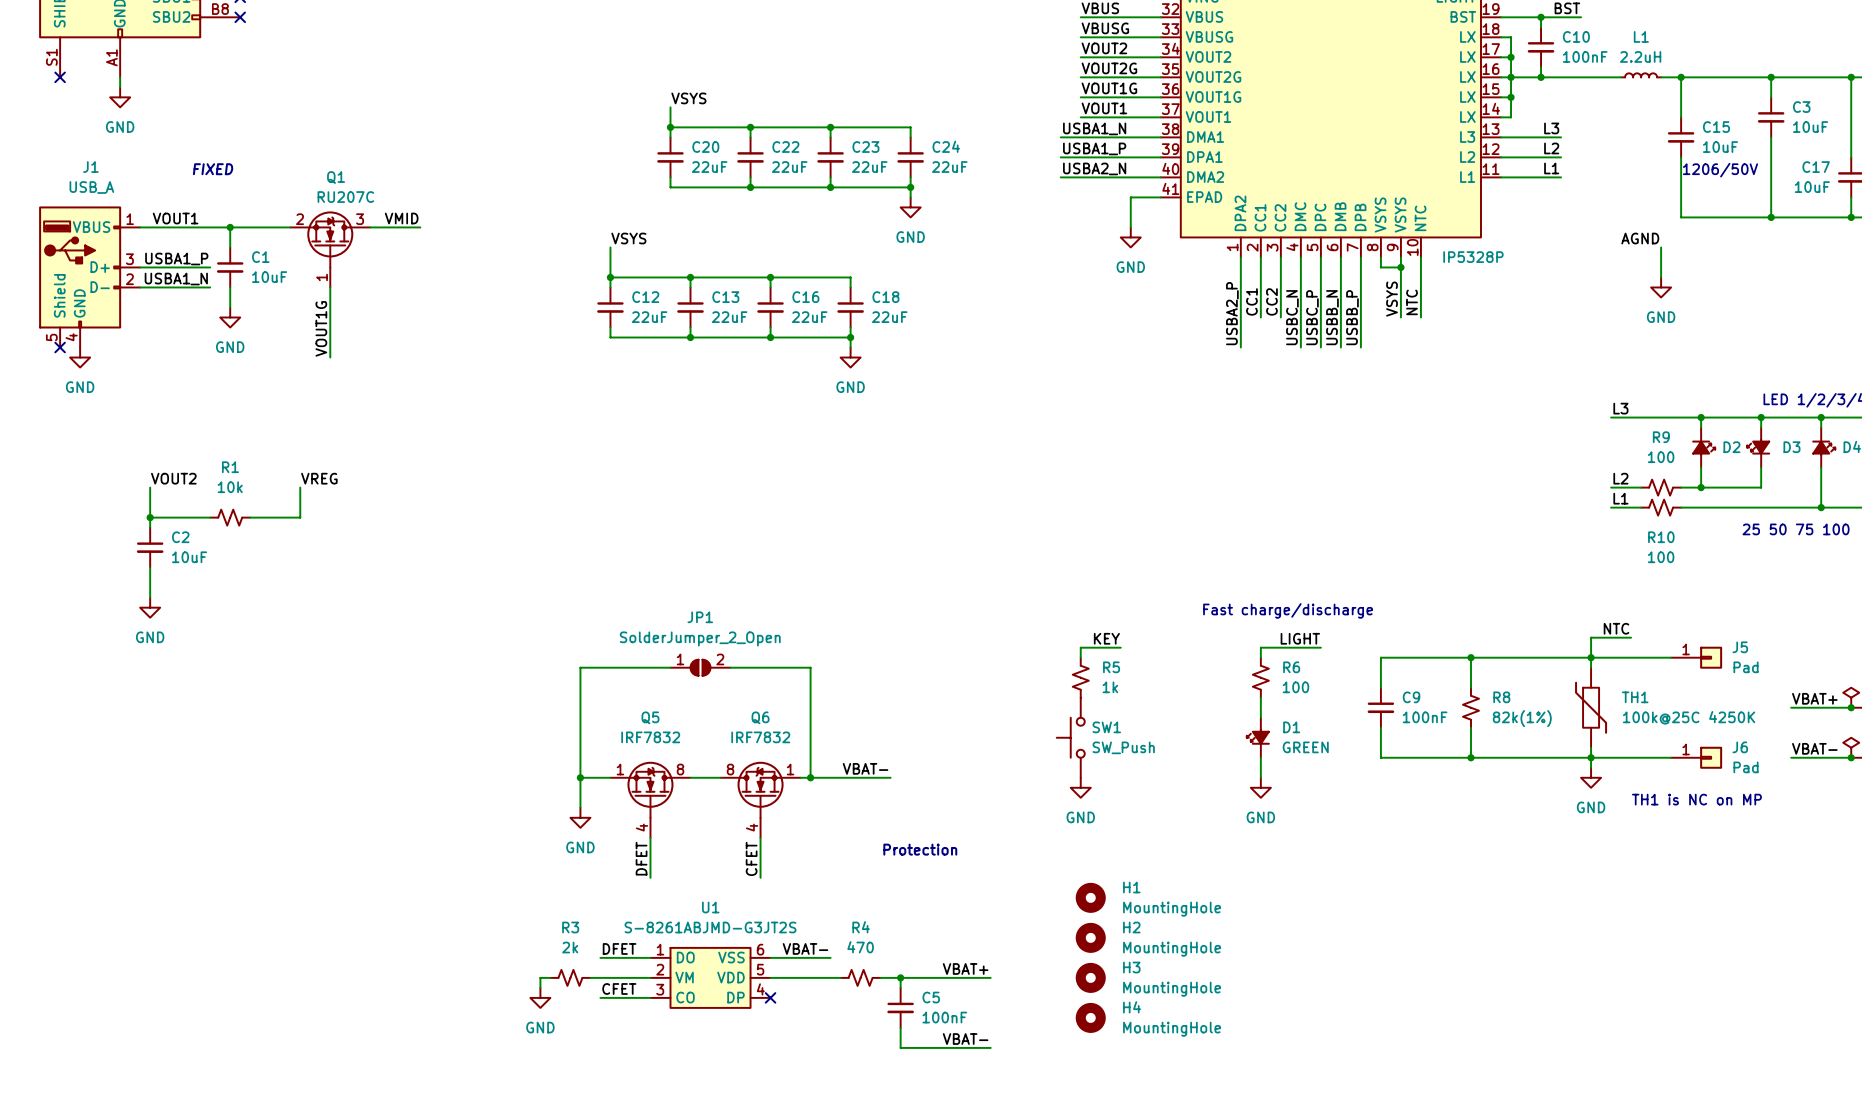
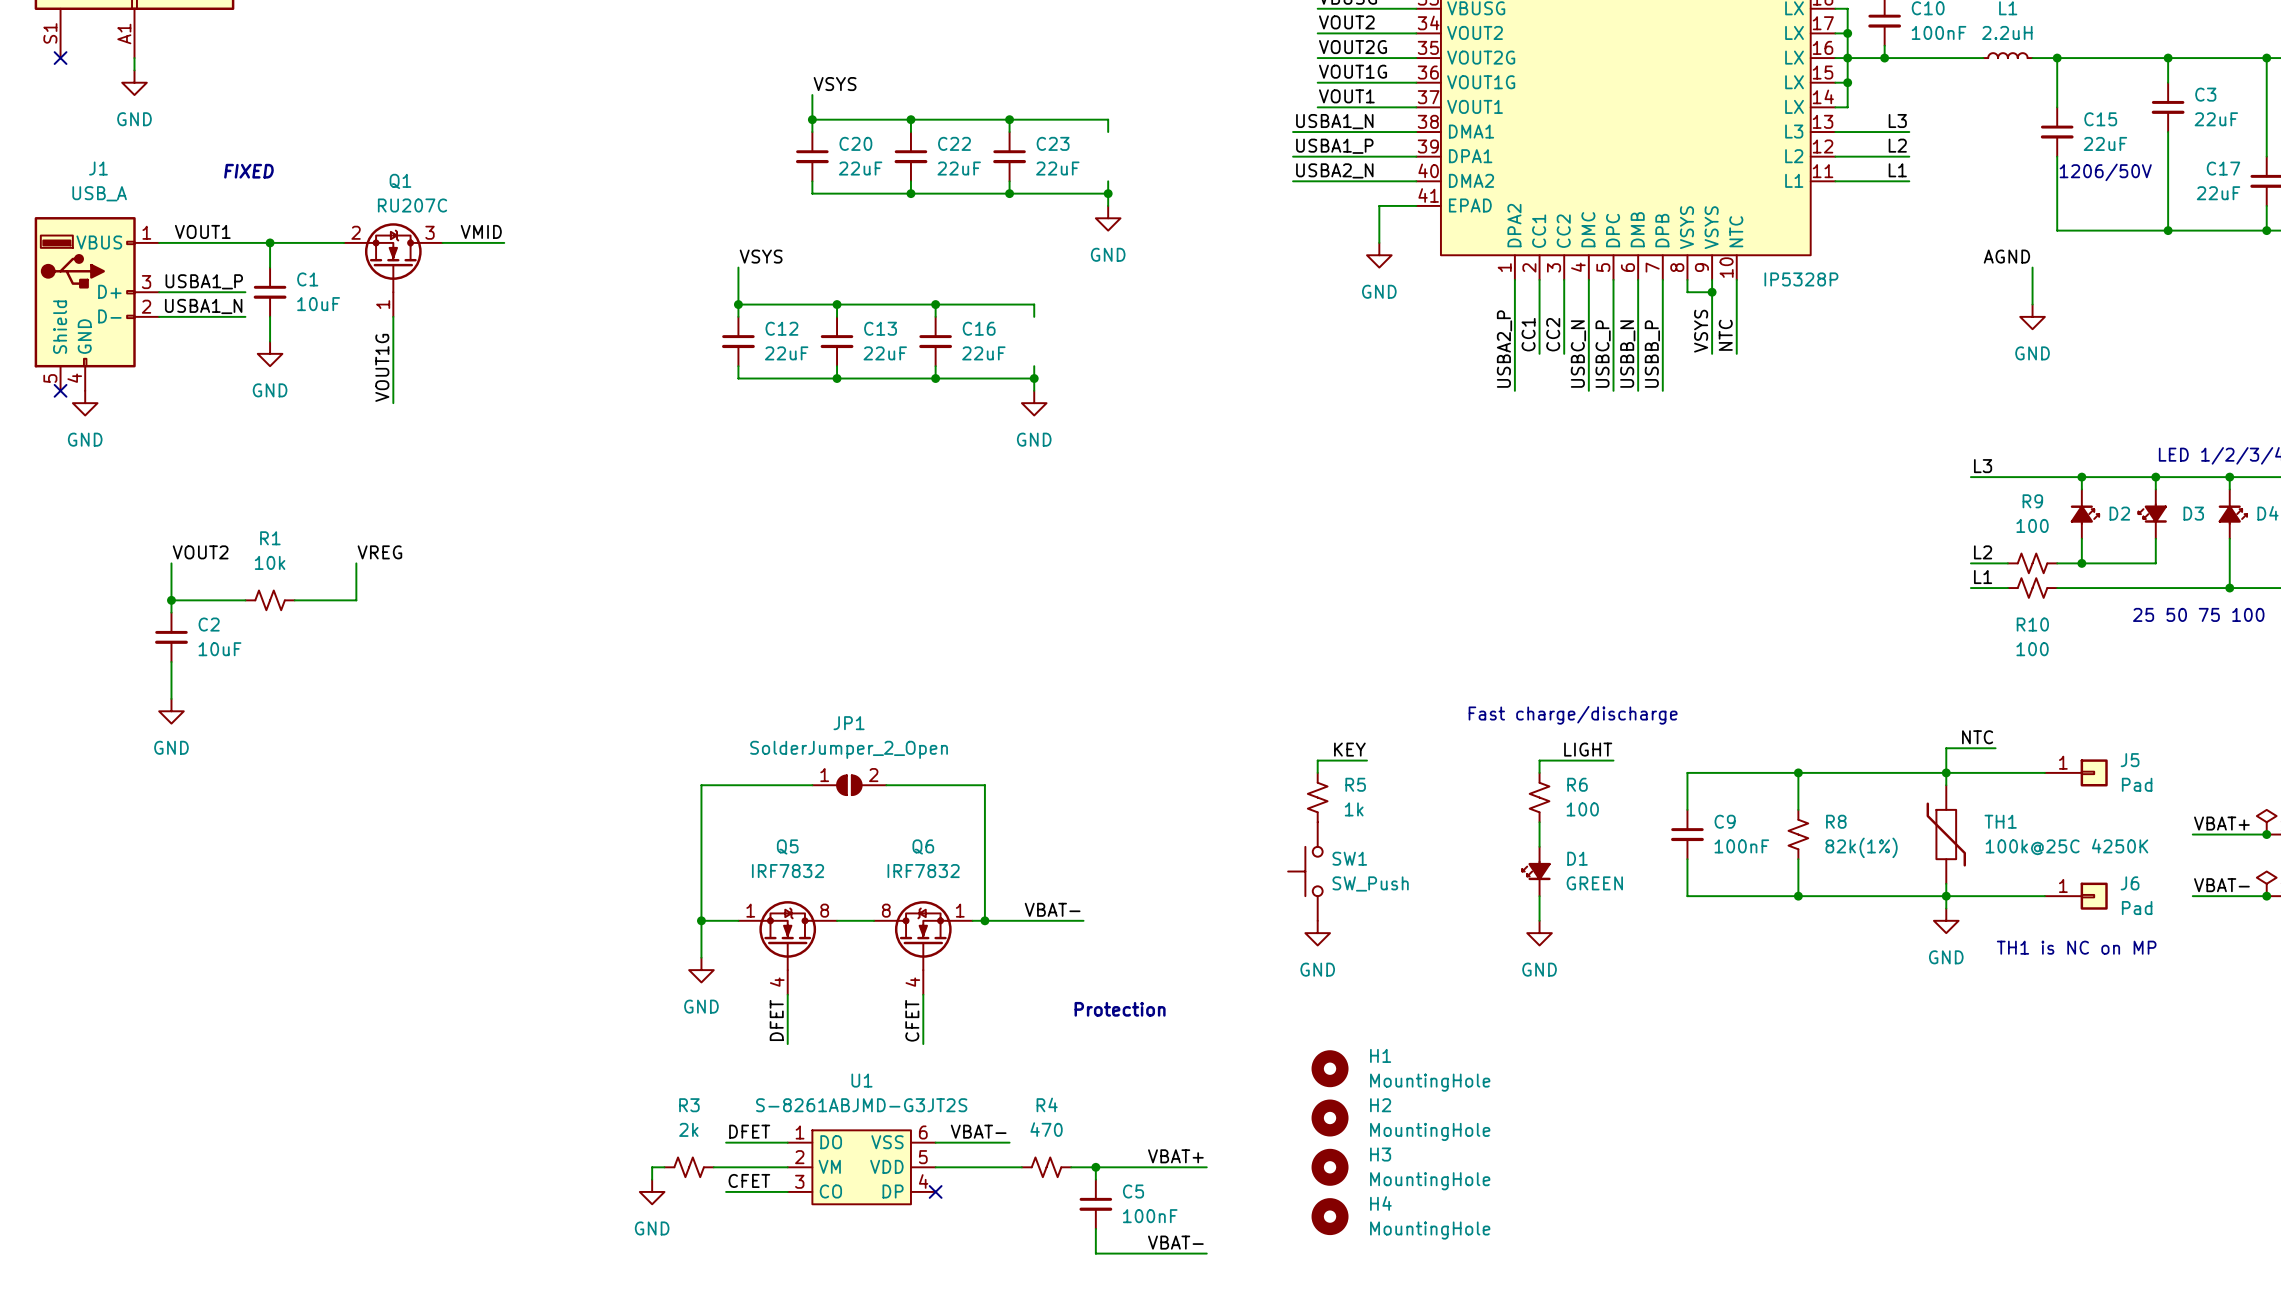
C3 value: 10uF (1810, 127) -> 22uF (2216, 119)
C15 value: 10uF (1720, 147) -> 22uF (2105, 143)
C24: 22uF (910, 157) -> none
C17 value: 10uF (1812, 187) -> 22uF (2218, 193)
C18: 22uF (850, 307) -> none

